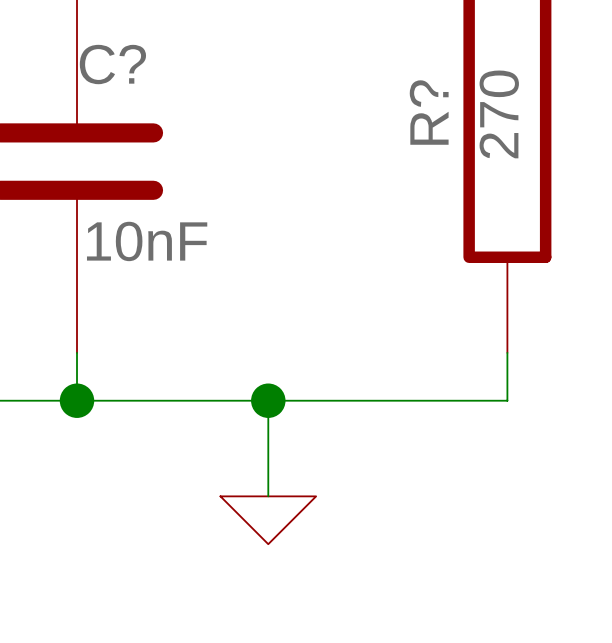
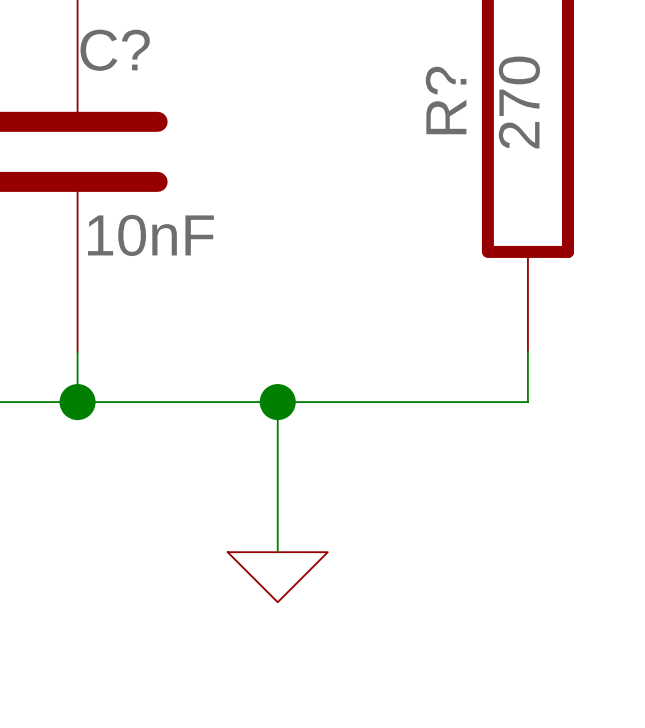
wire: none -> (277, 502) (277, 552)
power symbol position: (268, 520) -> (277, 577)

